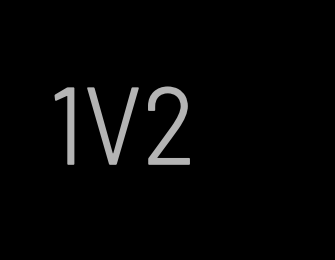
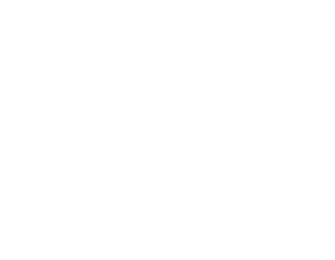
text: 1V2 (122, 125) -> none

